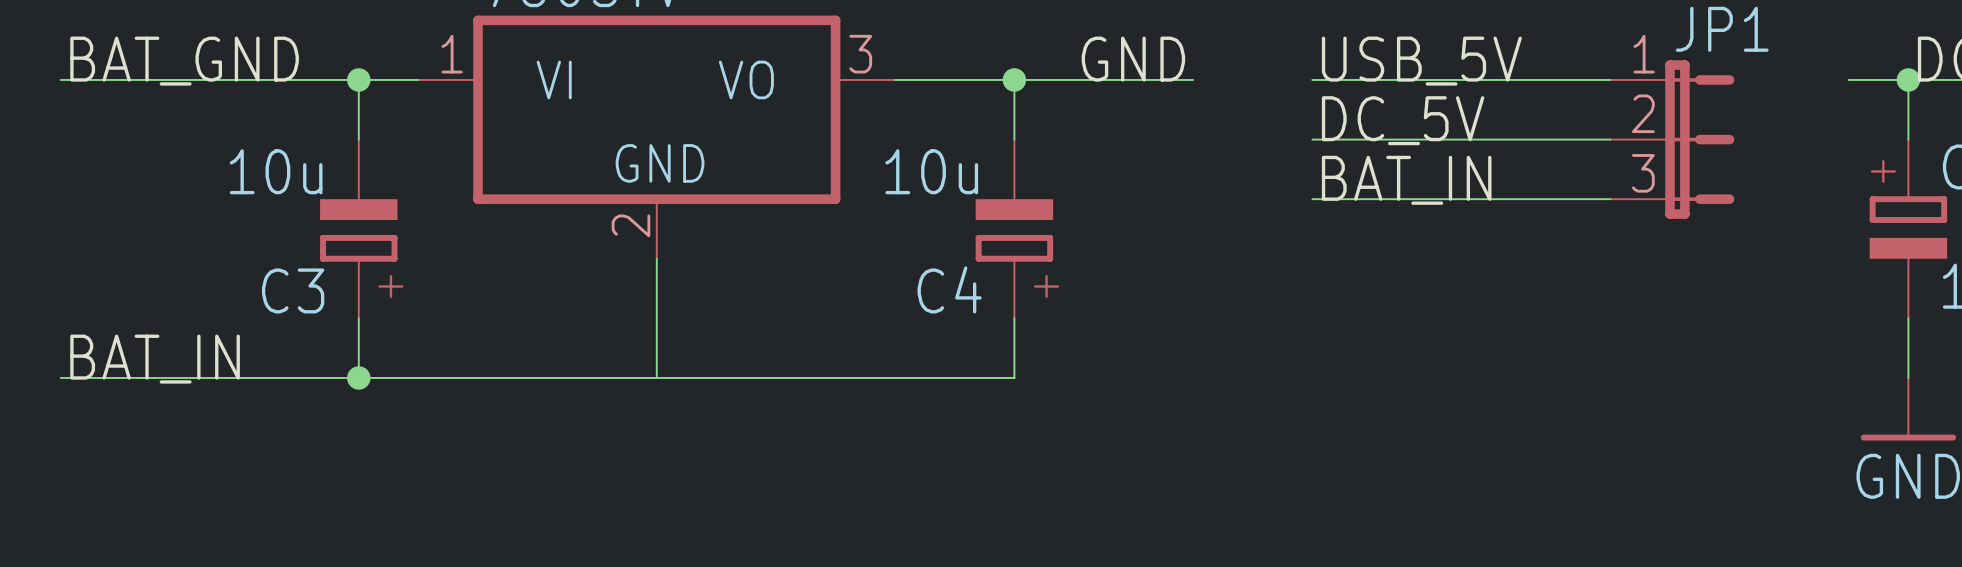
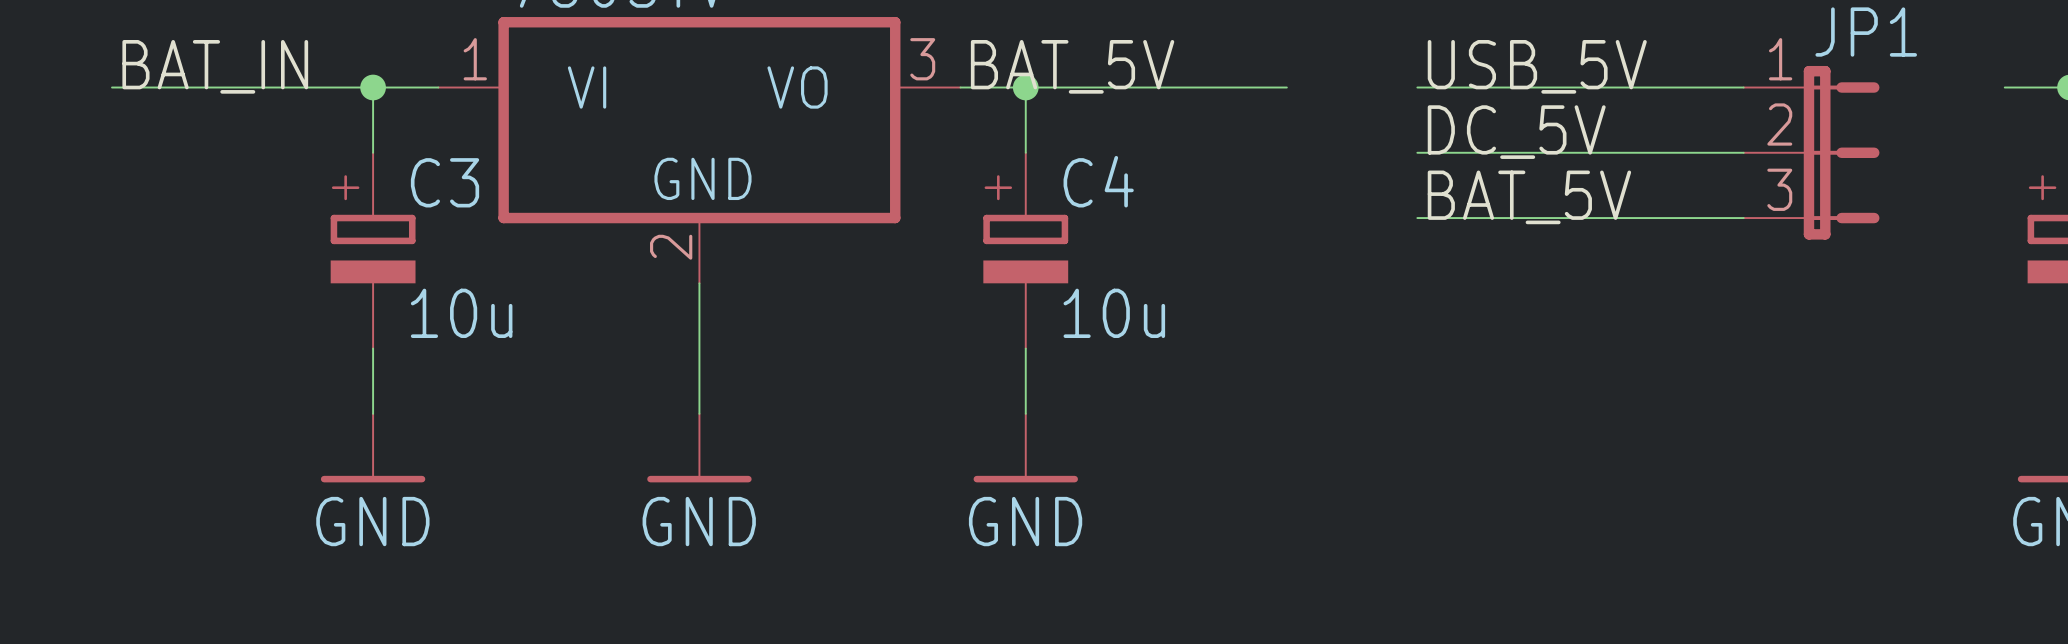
label: GND (1133, 59) -> none
label: BAT_GND (184, 61) -> none
label: none -> BAT_5V (1072, 66)
wire: (60, 79) (120, 79) -> none
wire: (1014, 79) (1014, 139) -> (1025, 87) (1025, 152)
junction position: (1014, 79) -> (1025, 87)
C3 symbol: [320, 139, 398, 319] -> [330, 152, 416, 349]
C4 symbol: [975, 139, 1054, 319] -> [983, 152, 1069, 349]
C3 value position: 10u (276, 171) -> 10u (461, 313)
C4 value position: 10u (931, 171) -> 10u (1114, 313)
label: BAT_IN (1406, 180) -> BAT_5V (1529, 197)
C4 name position: C4 (949, 289) -> C4 (1098, 181)
C3 name position: C3 (293, 290) -> C3 (445, 182)
wire: none -> (1025, 348) (1025, 413)
wire: (1014, 318) (1014, 377) (60, 377) -> none
label position: BAT_IN (155, 359) -> BAT_IN (215, 66)
junction: (358, 377) -> none
power symbol: none -> GND (373, 448)
power symbol: none -> GND (699, 448)
power symbol: none -> GND (1025, 448)

